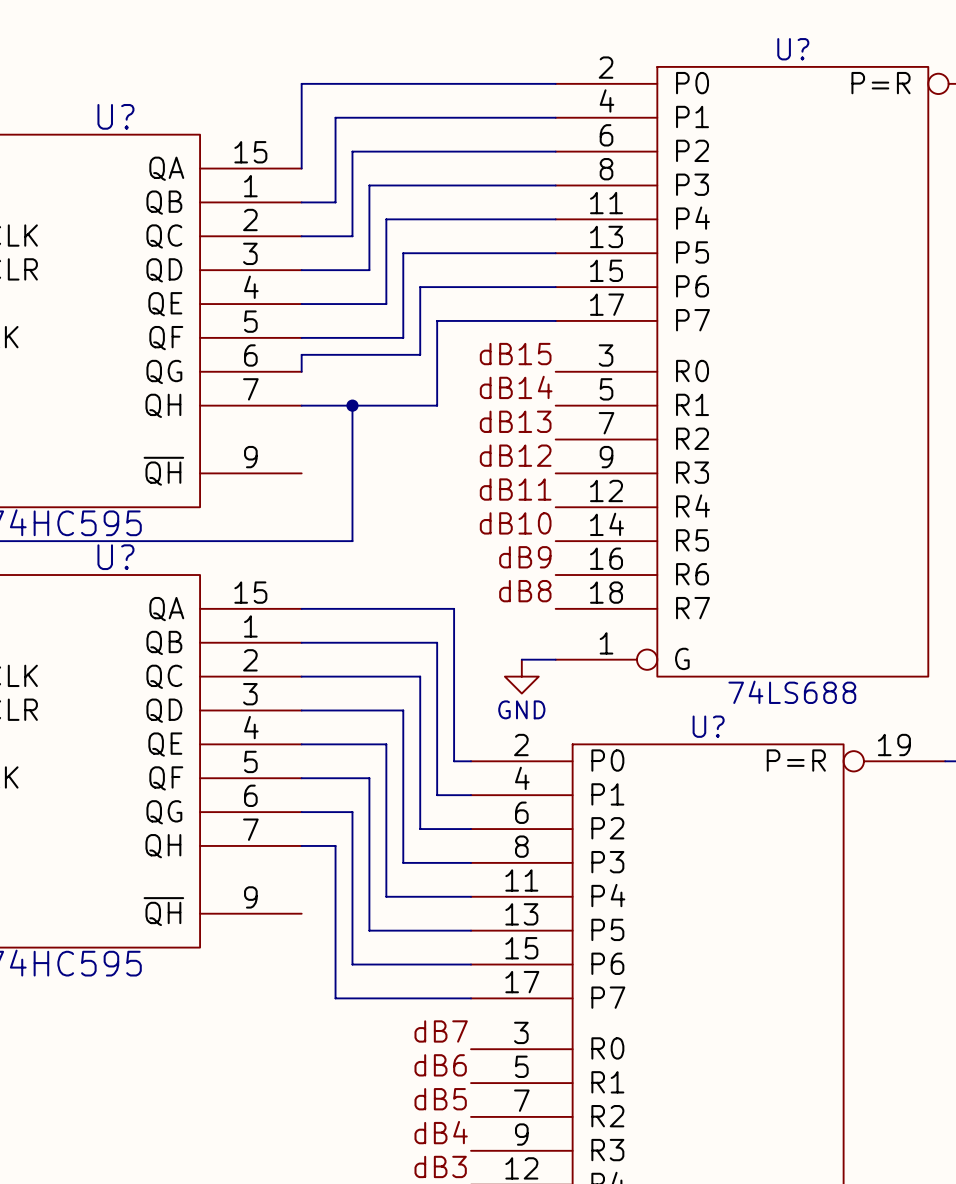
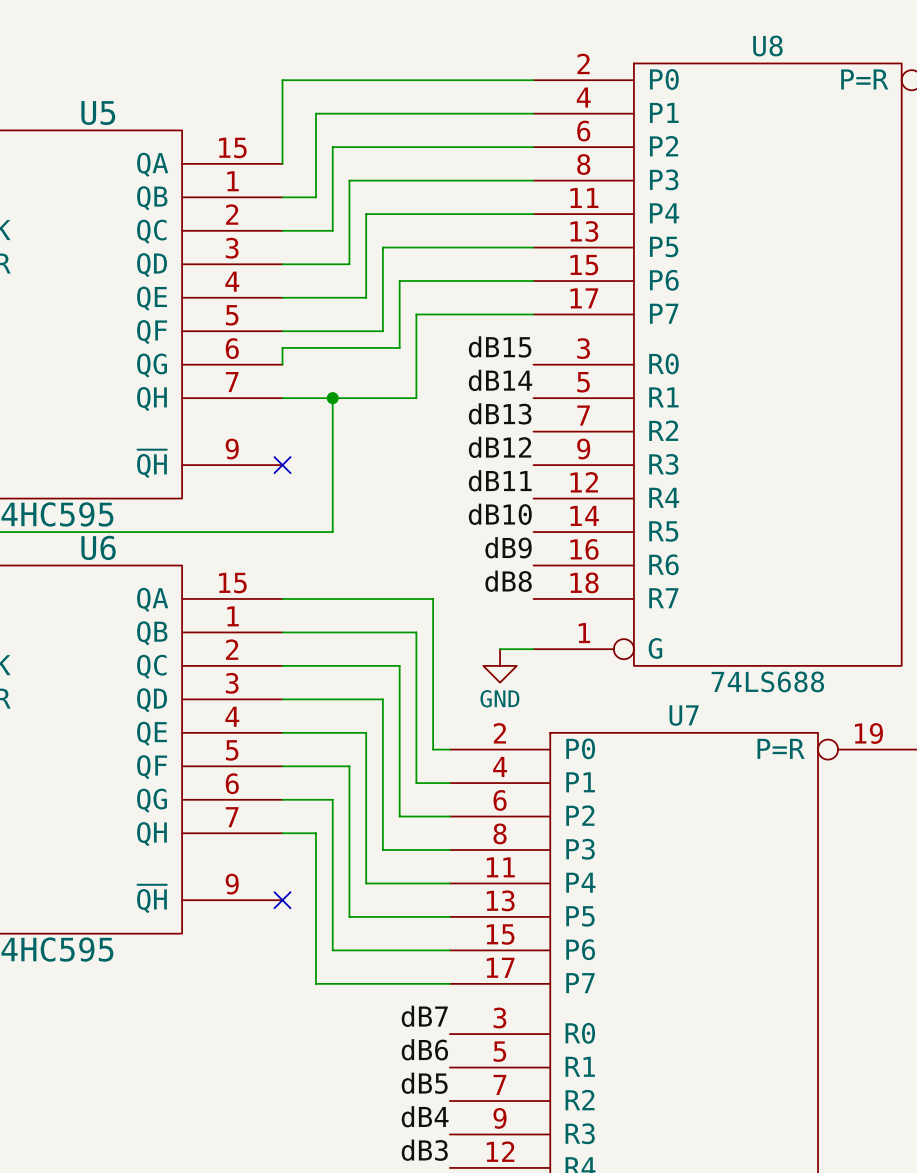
U? name: U? (793, 49) -> U8 (767, 45)
U? name: U? (115, 116) -> U5 (98, 113)
no-connect mark: none -> (282, 465)
U? name: U? (115, 557) -> U6 (98, 547)
U? name: U? (708, 726) -> U7 (684, 715)
no-connect mark: none -> (282, 900)

